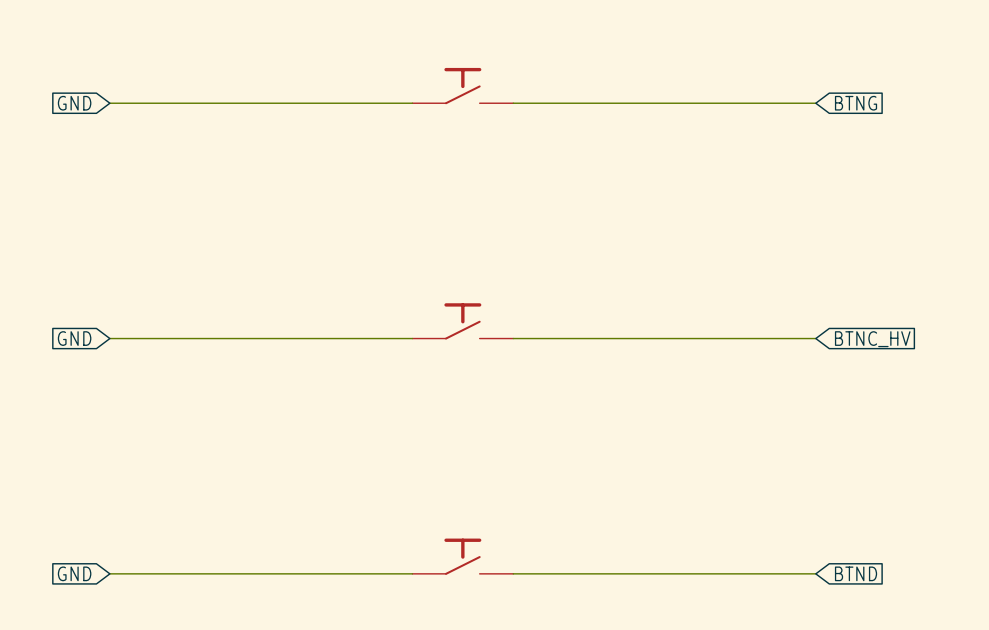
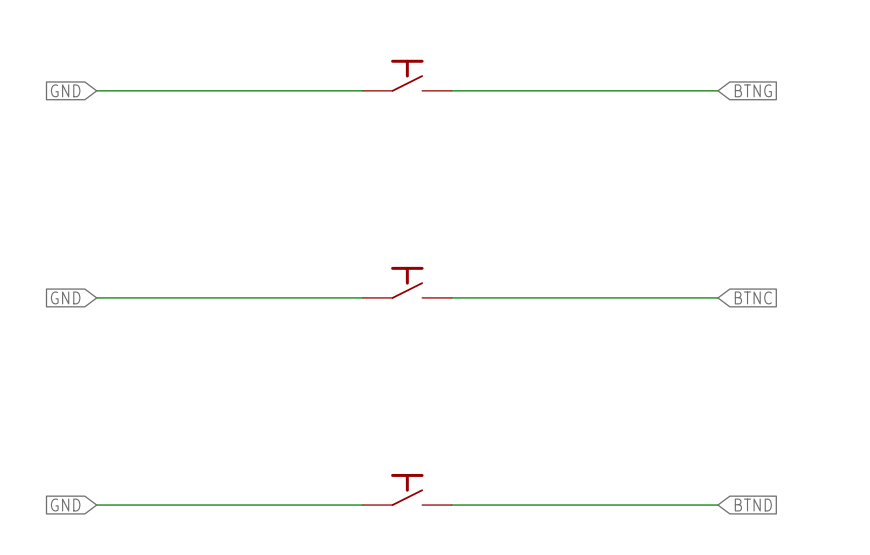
global label: BTNC_HV (872, 339) -> BTNC (753, 297)

